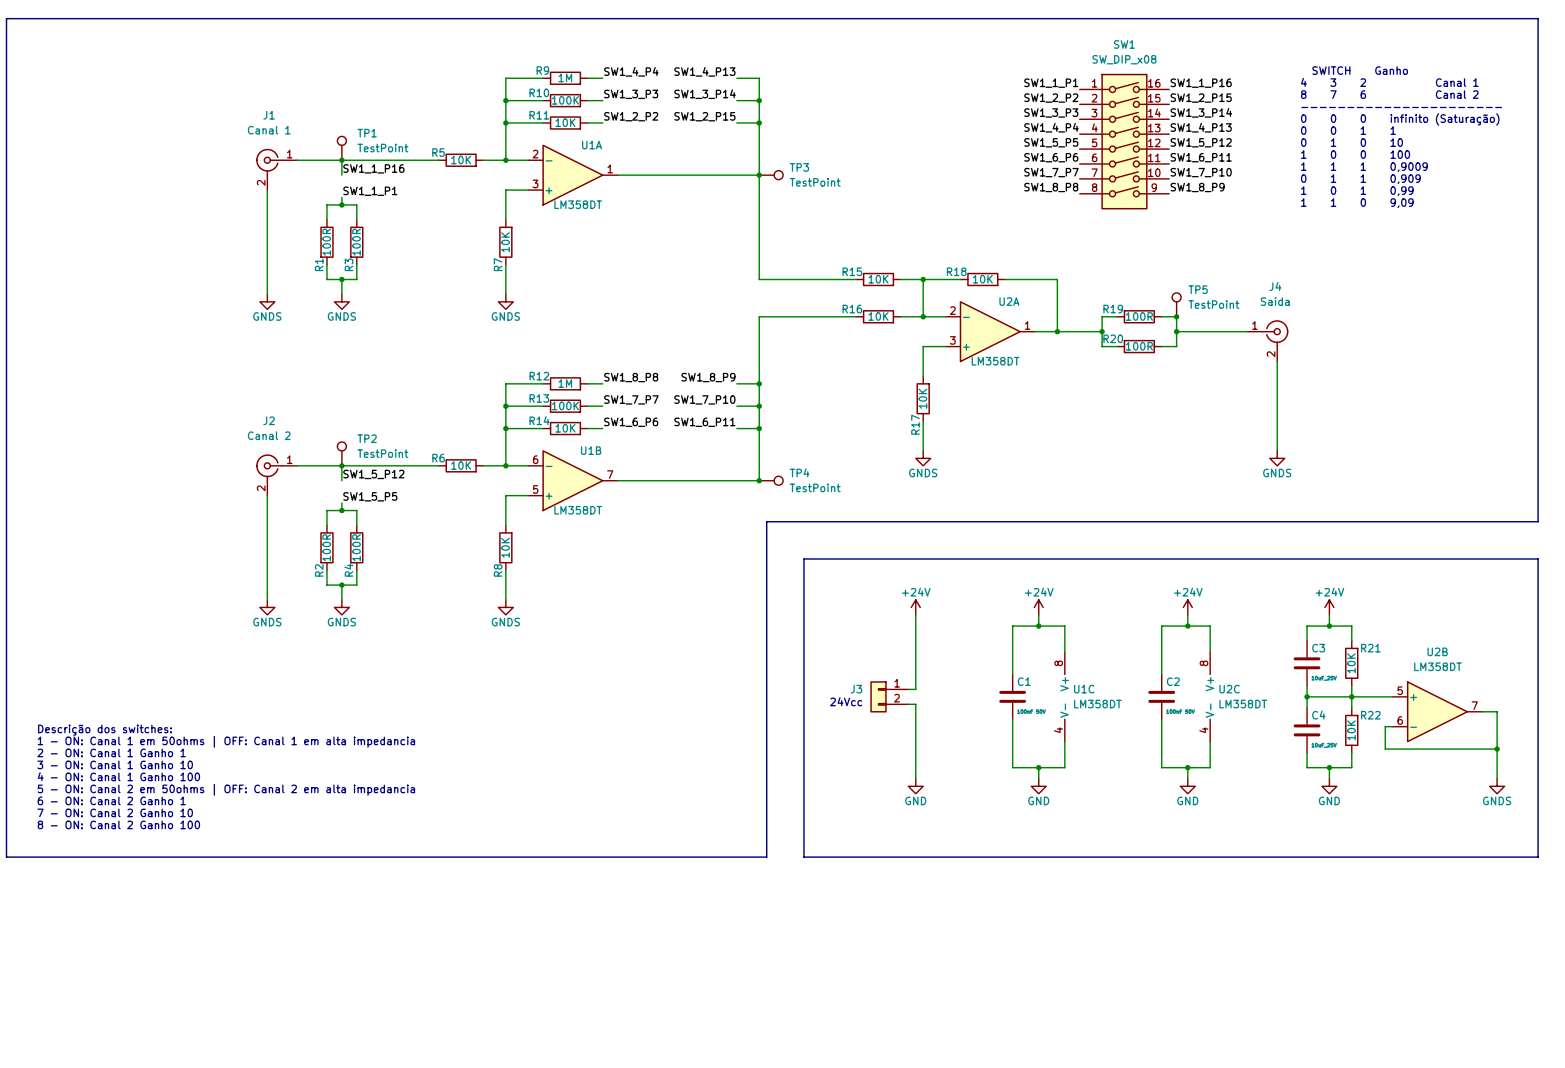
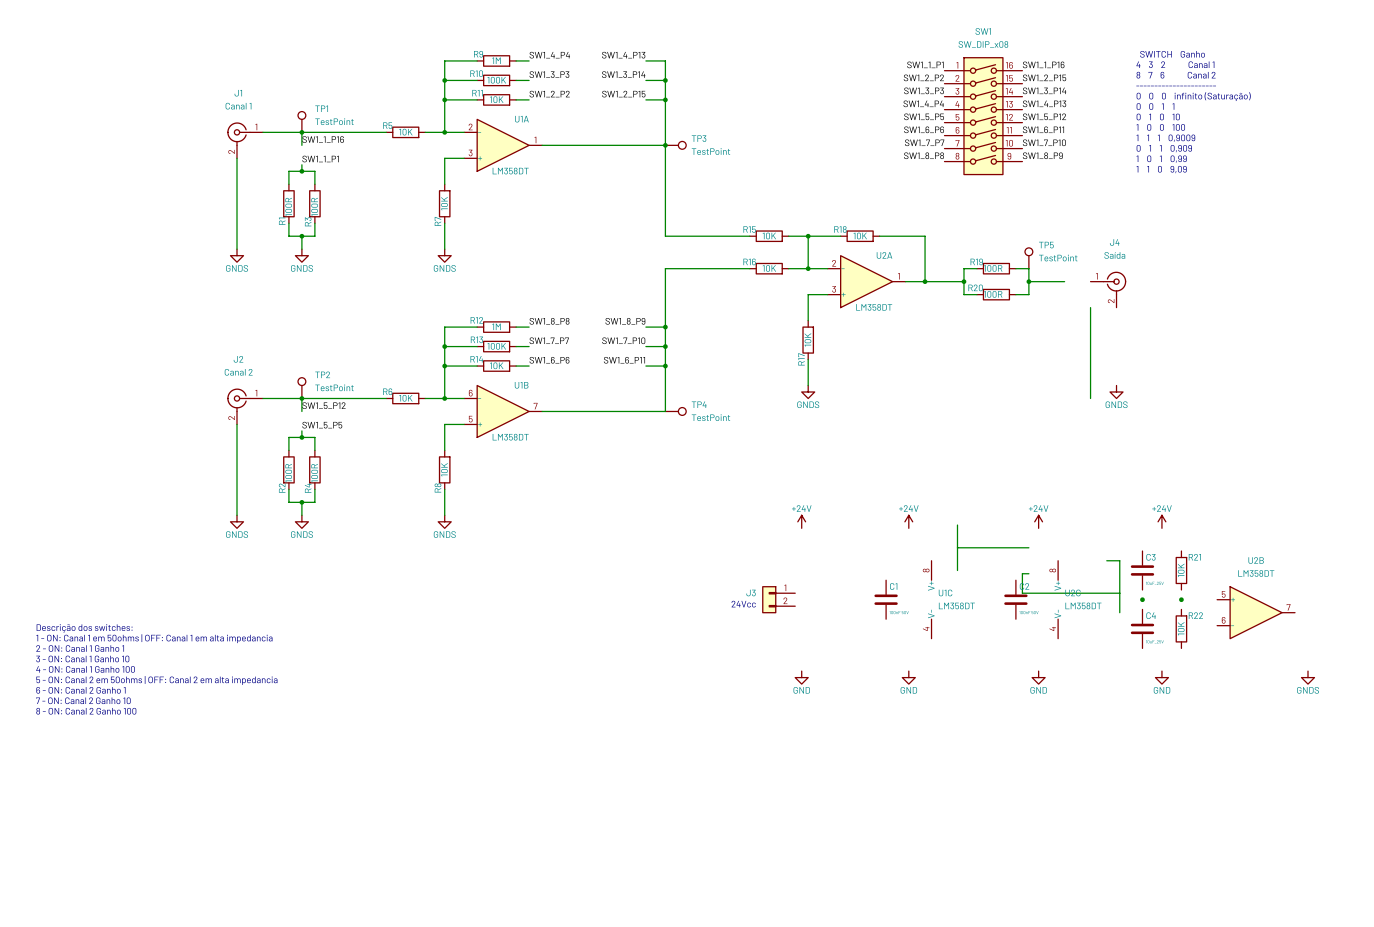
line: (6, 18) (6, 857) (766, 857) (766, 521) (1538, 521) (1538, 18) (6, 18) -> none
junction: (1176, 316) -> none
wire: (1217, 331) (1247, 331) -> none
wire: none -> (1090, 307) (1090, 398)
wire: (1277, 361) (1277, 450) -> none
junction: (759, 480) -> none
line: (803, 558) (1538, 558) (1538, 857) (803, 857) (803, 558) -> none
wire: none -> (957, 525) (957, 570)
wire: (915, 614) (915, 689) (908, 689) -> none
wire: (1038, 614) (1038, 626) -> none
wire: (1187, 614) (1187, 626) -> none
wire: (1329, 614) (1329, 626) -> none
junction: (1038, 626) -> none
junction: (1187, 626) -> none
junction: (1329, 626) -> none
wire: none -> (957, 547) (1028, 547)
wire: (1307, 640) (1307, 626) (1351, 626) (1351, 640) -> none
wire: (1064, 652) (1064, 626) (1012, 626) (1012, 674) -> none
wire: (1210, 652) (1210, 626) (1161, 626) (1161, 674) -> none
wire: none -> (1106, 560) (1119, 560) (1119, 612)
wire: none -> (1028, 573) (1022, 573) (1022, 593) (1119, 593)
wire: (1307, 685) (1307, 708) -> none
wire: (1351, 685) (1351, 708) -> none
wire: (1307, 696) (1392, 696) -> none
wire: (908, 704) (915, 704) (915, 778) -> none
wire: (1482, 711) (1497, 711) (1497, 778) -> none
wire: (1012, 719) (1012, 767) (1064, 767) (1064, 741) -> none
wire: (1161, 719) (1161, 767) (1210, 767) (1210, 741) -> none
wire: (1392, 726) (1385, 726) (1385, 749) (1497, 749) -> none
junction: (1497, 749) -> none
wire: (1307, 752) (1307, 767) (1351, 767) (1351, 752) -> none
wire: (1038, 767) (1038, 778) -> none
junction: (1038, 767) -> none
wire: (1187, 767) (1187, 778) -> none
junction: (1187, 767) -> none
wire: (1329, 767) (1329, 778) -> none
junction: (1329, 767) -> none

